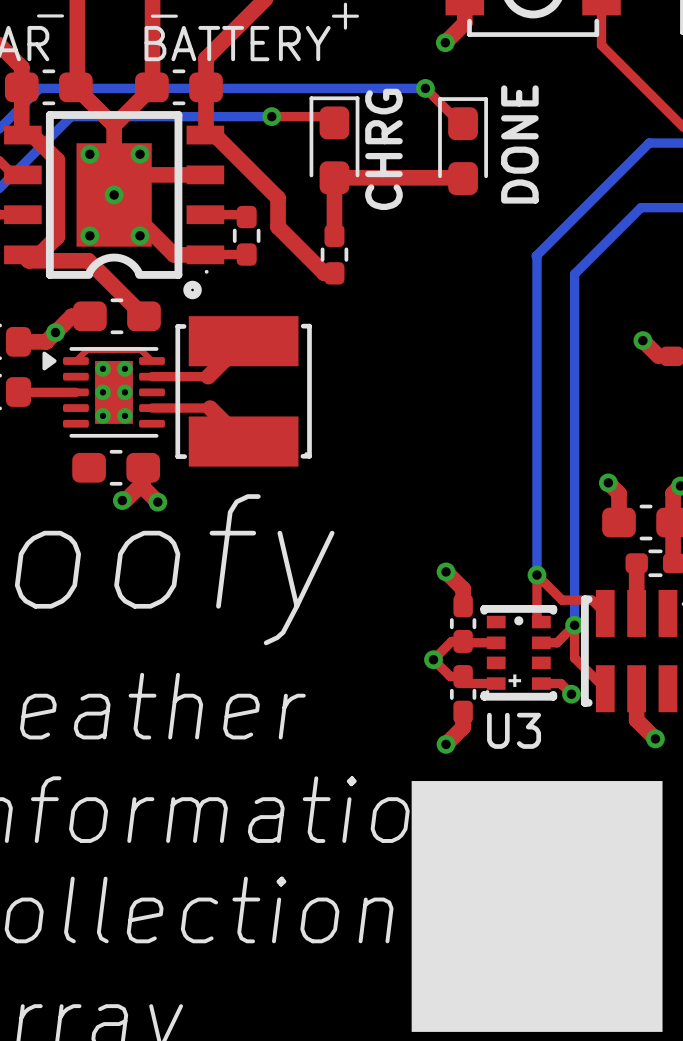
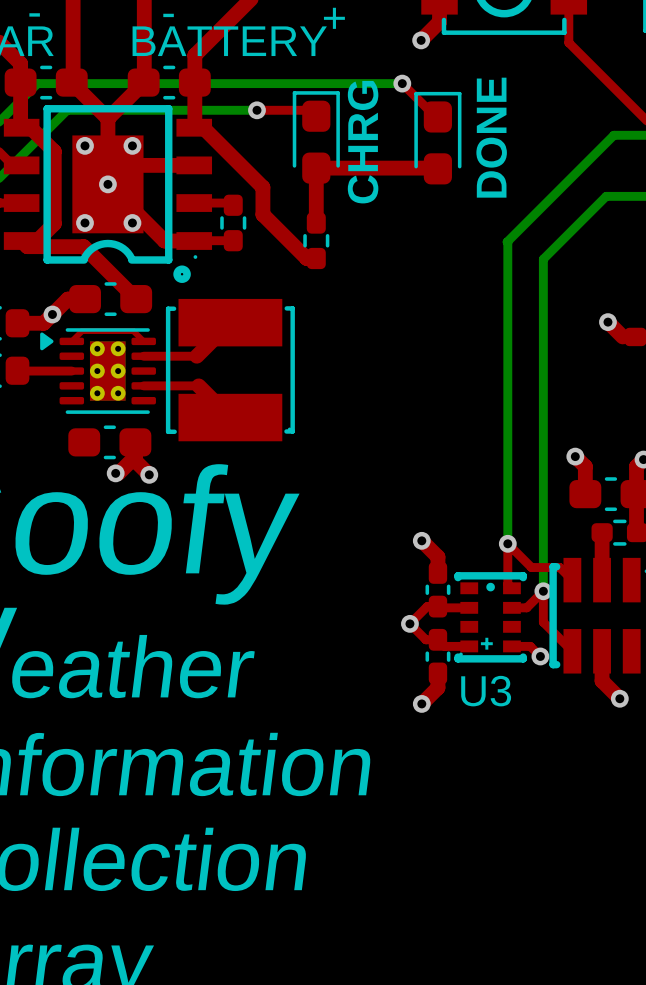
drawing: [411, 781, 663, 1032] -> none

